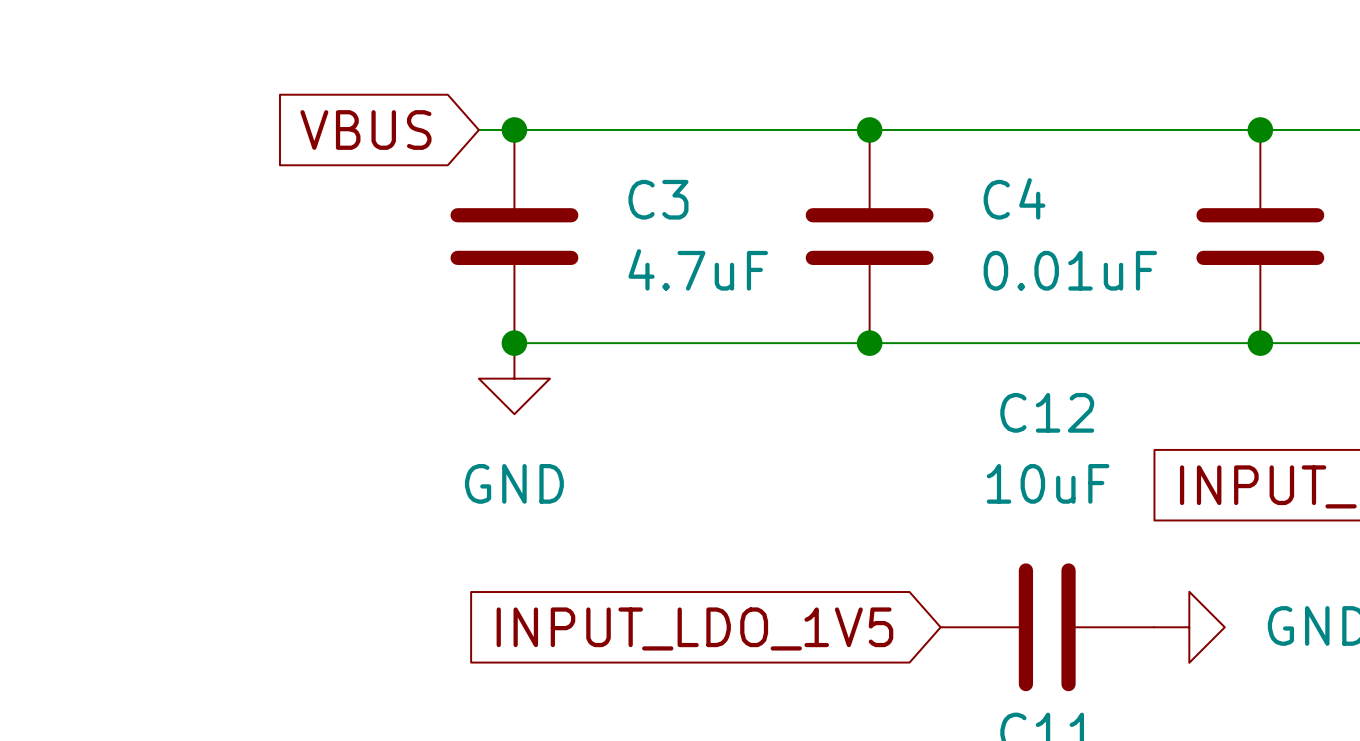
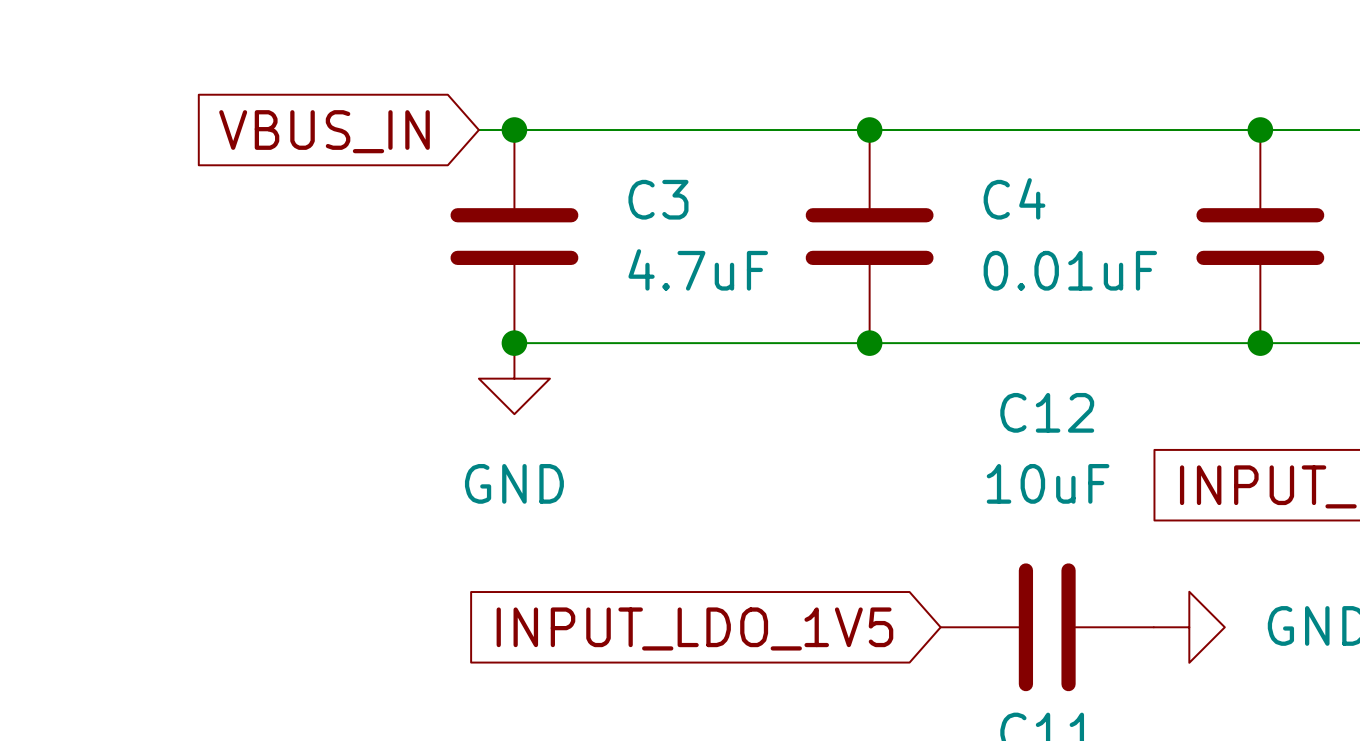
global label: VBUS (365, 130) -> VBUS_IN (324, 131)

